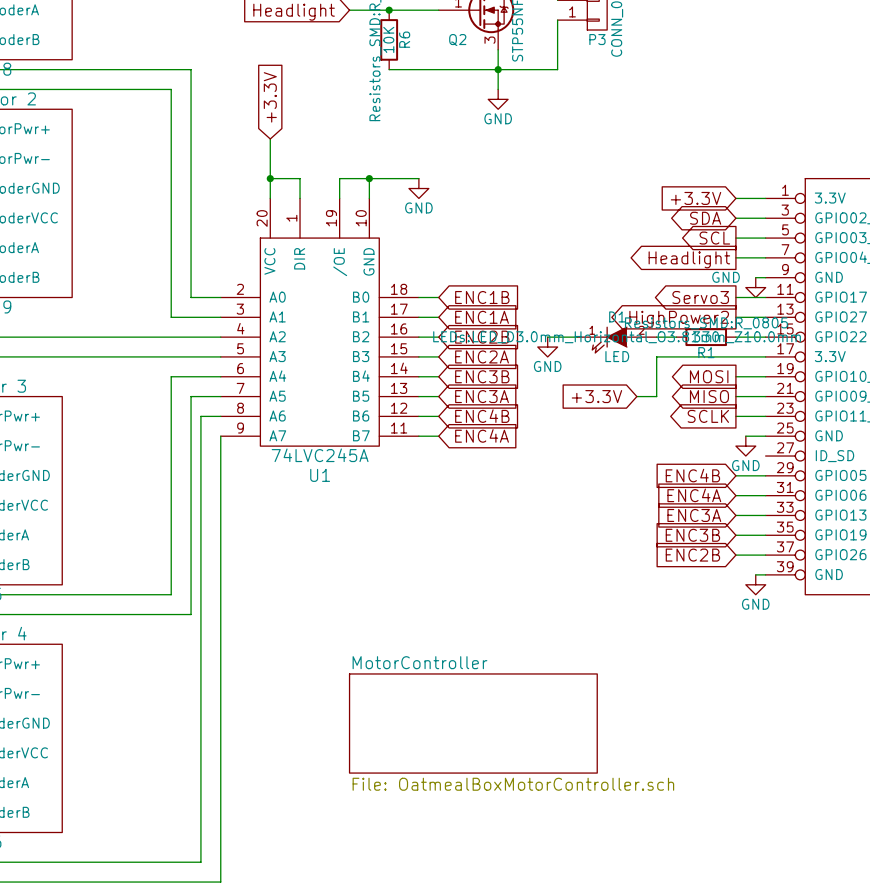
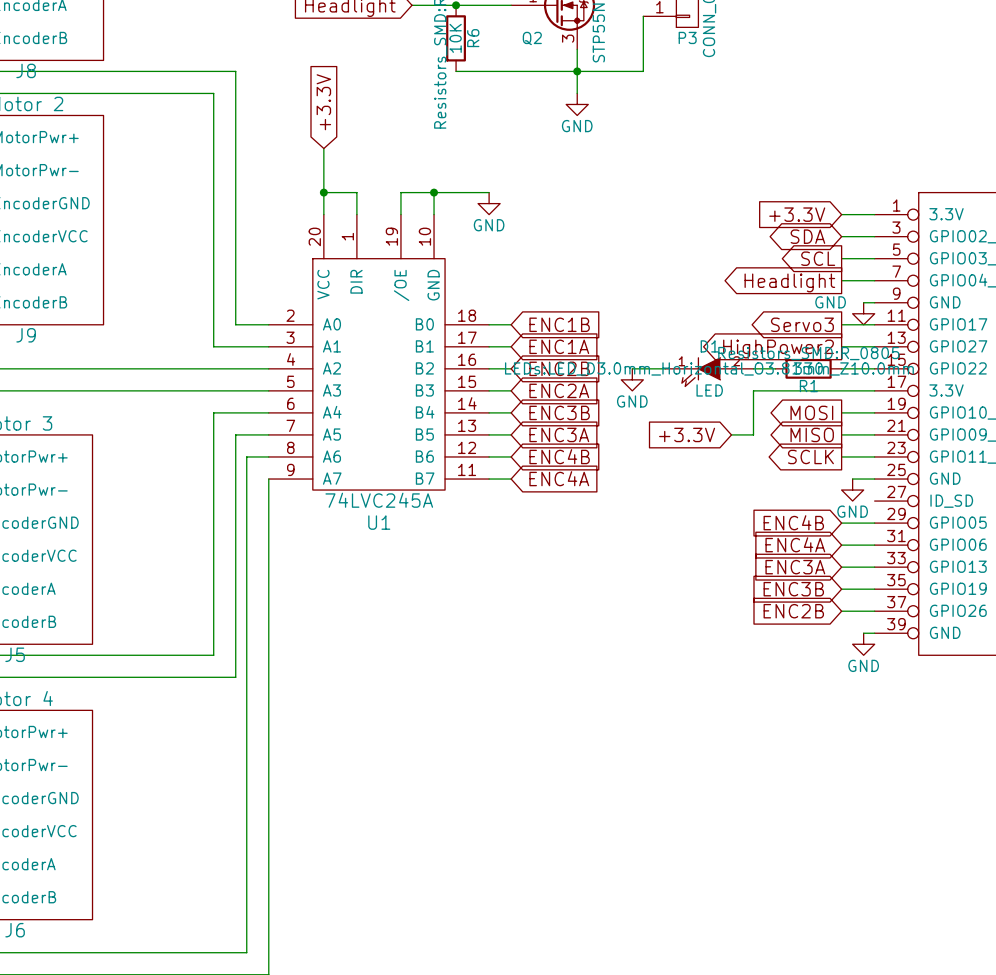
sheet MotorController: File: OatmealBoxMotorController.sch (473, 723) -> none

